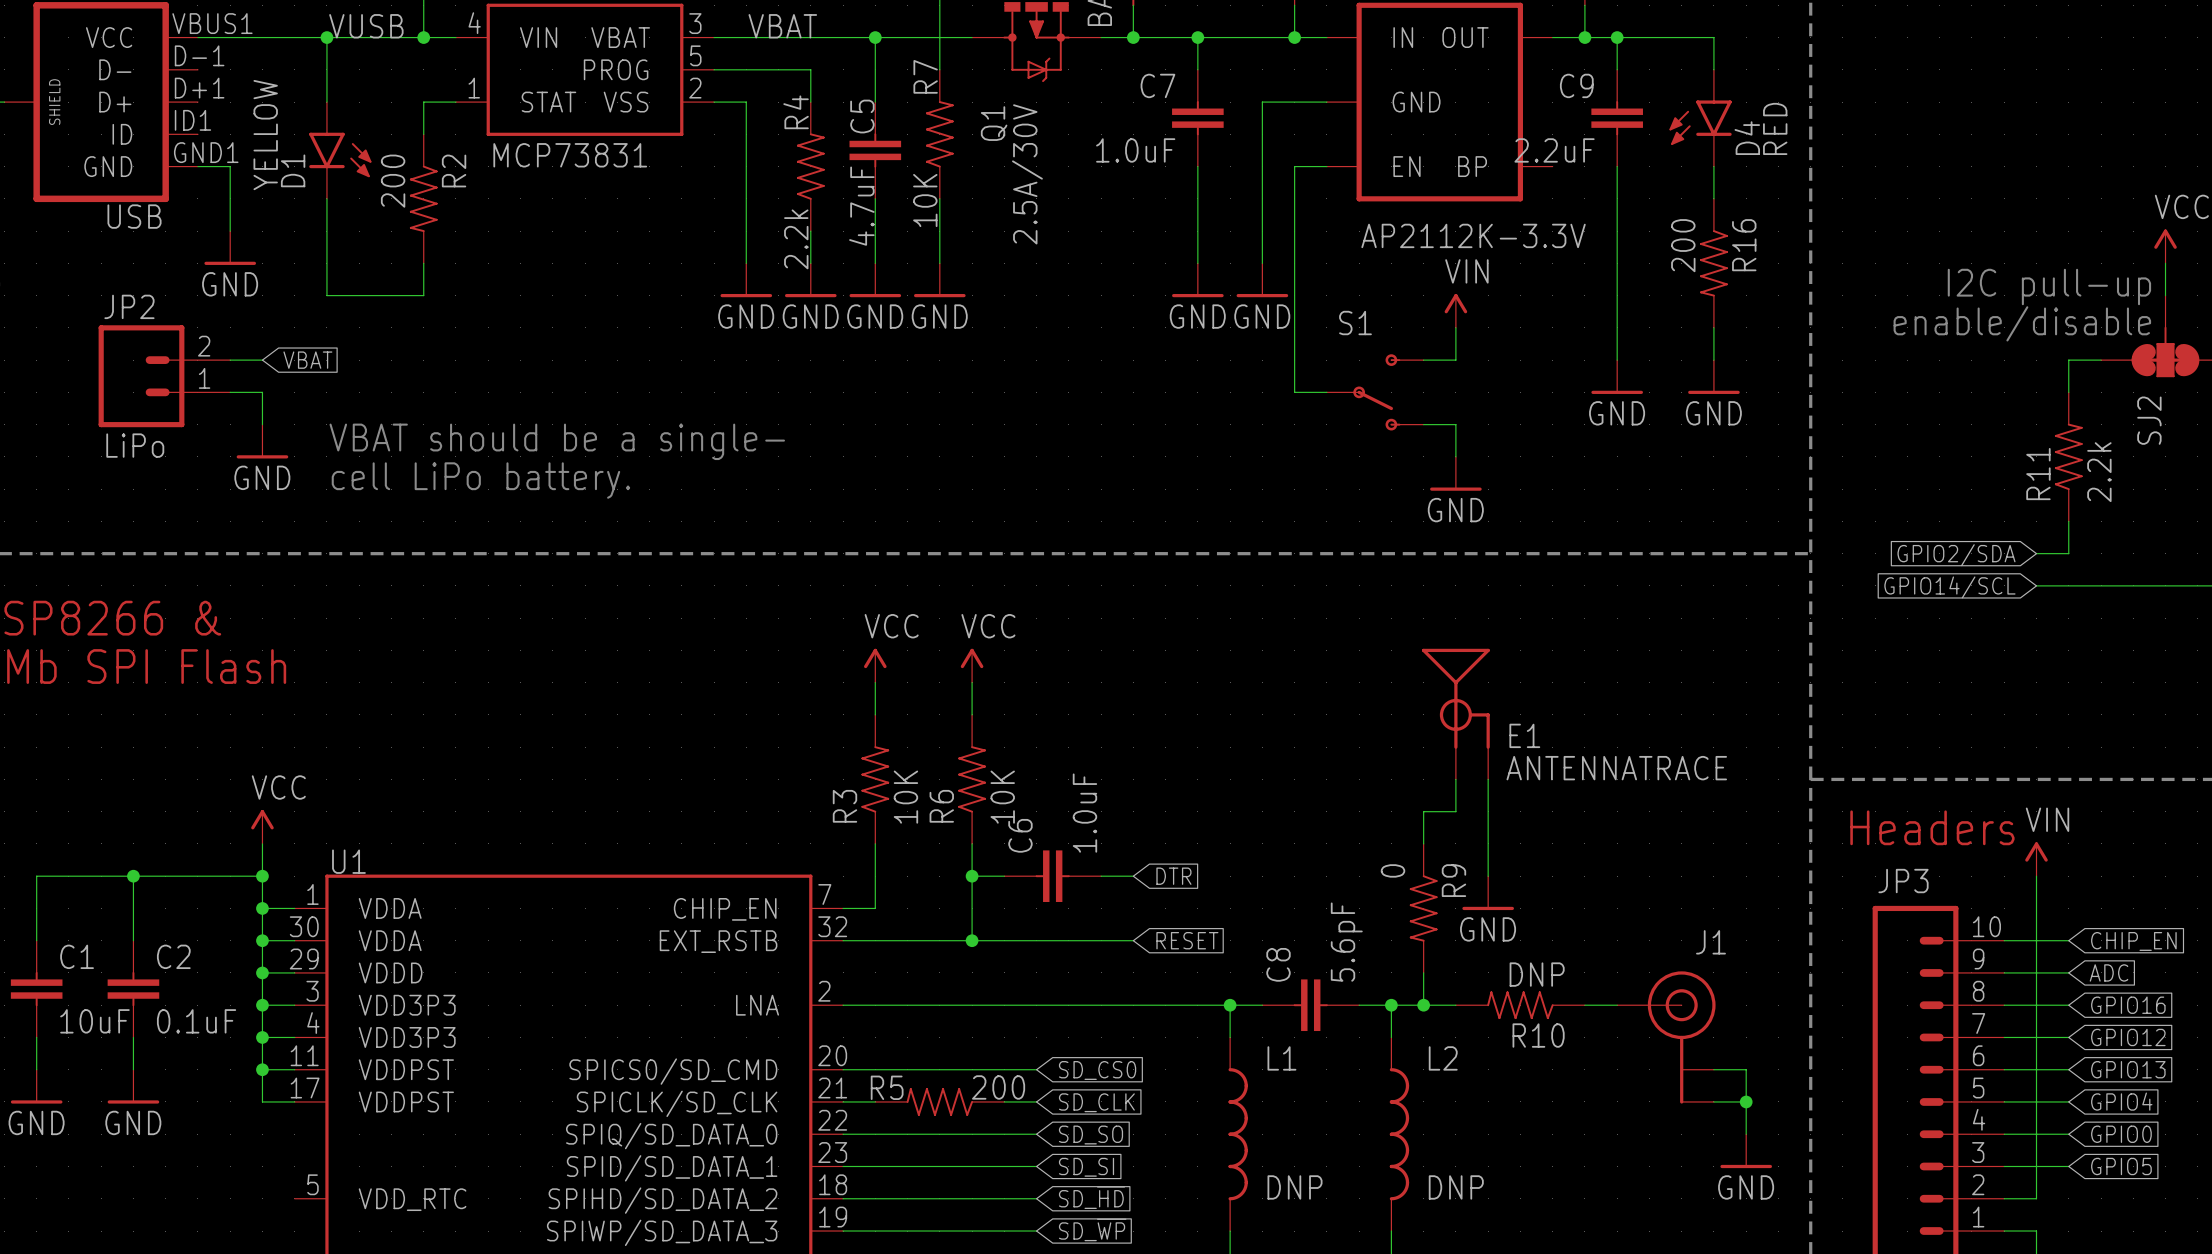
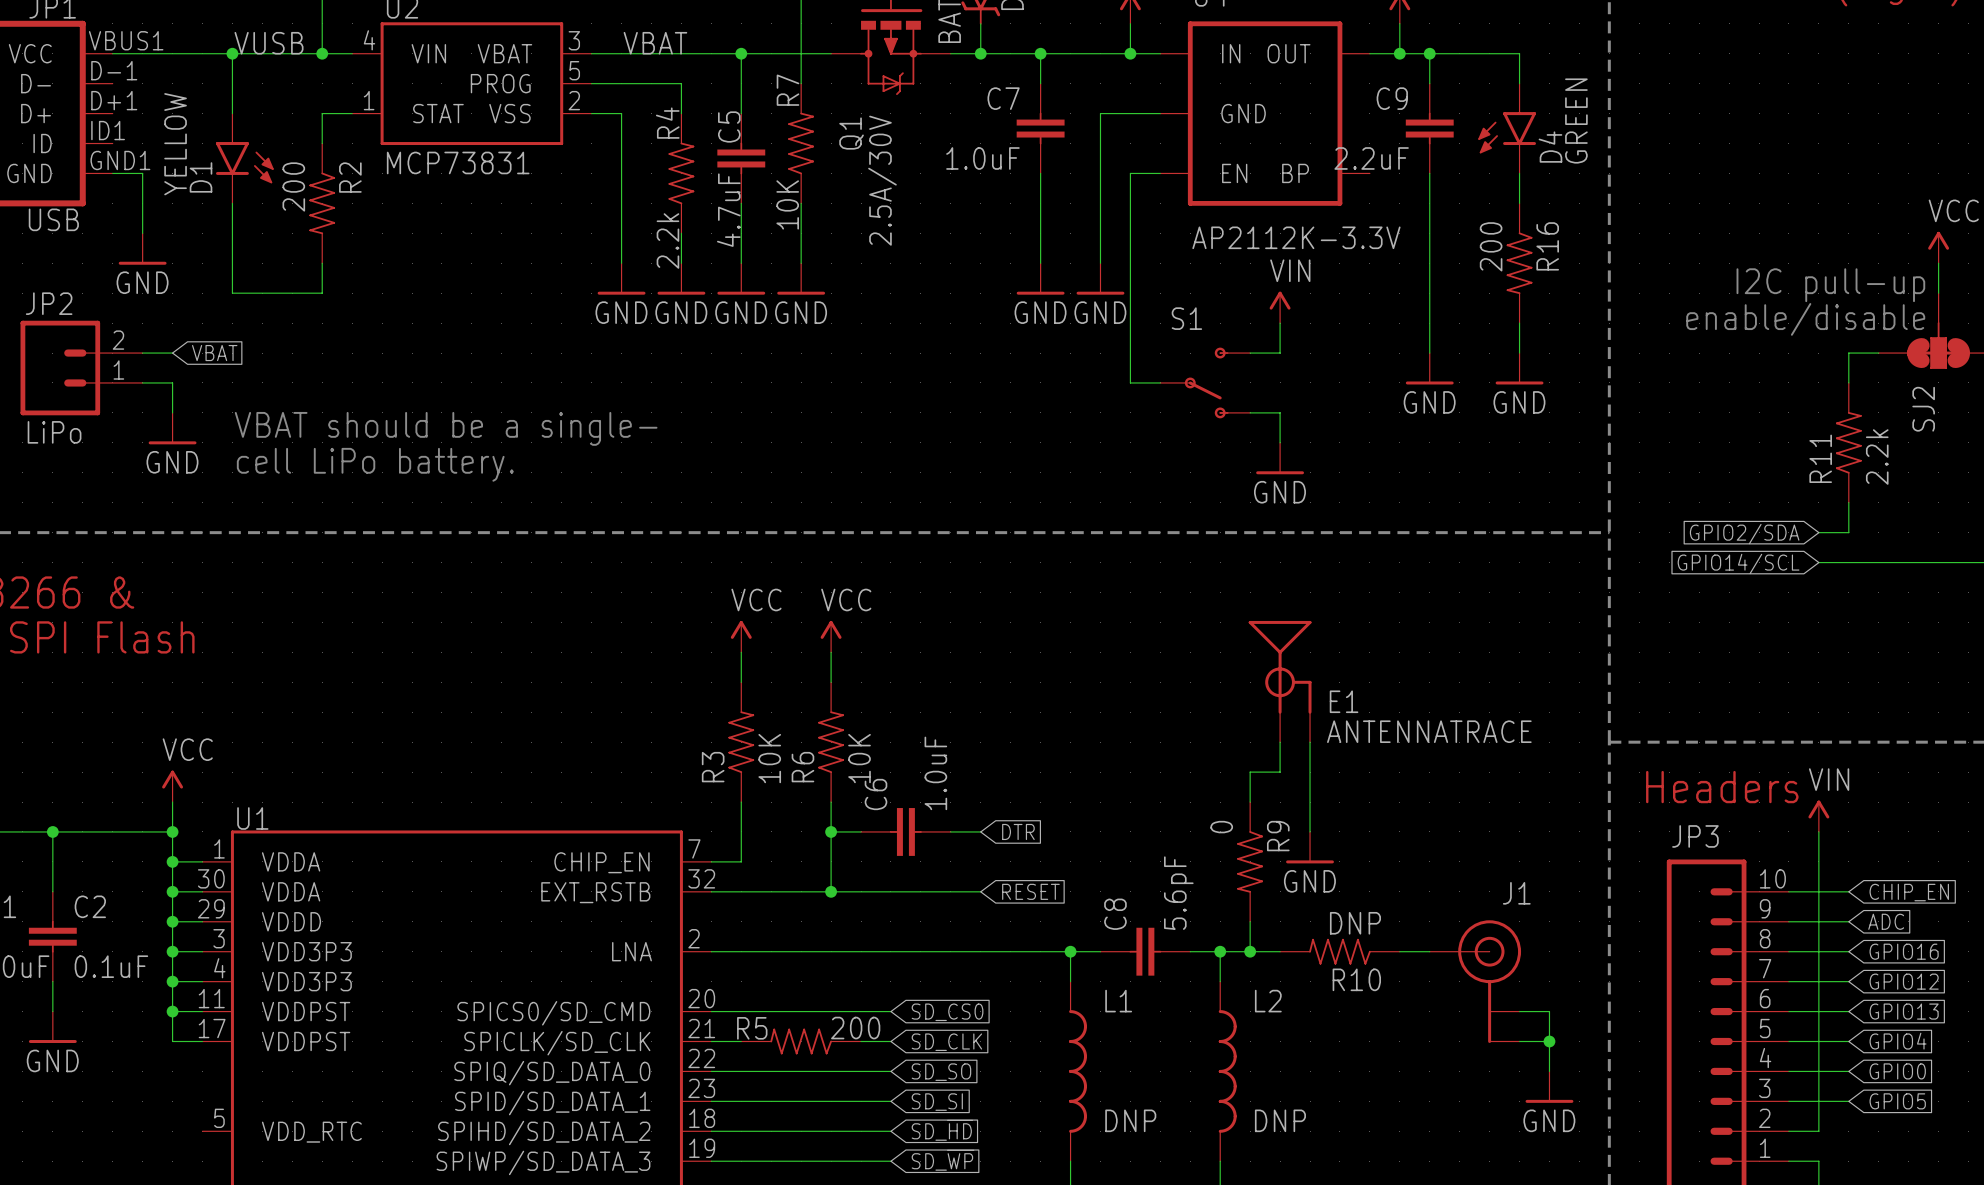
D4 value: RED (1775, 128) -> GREEN (1576, 121)

